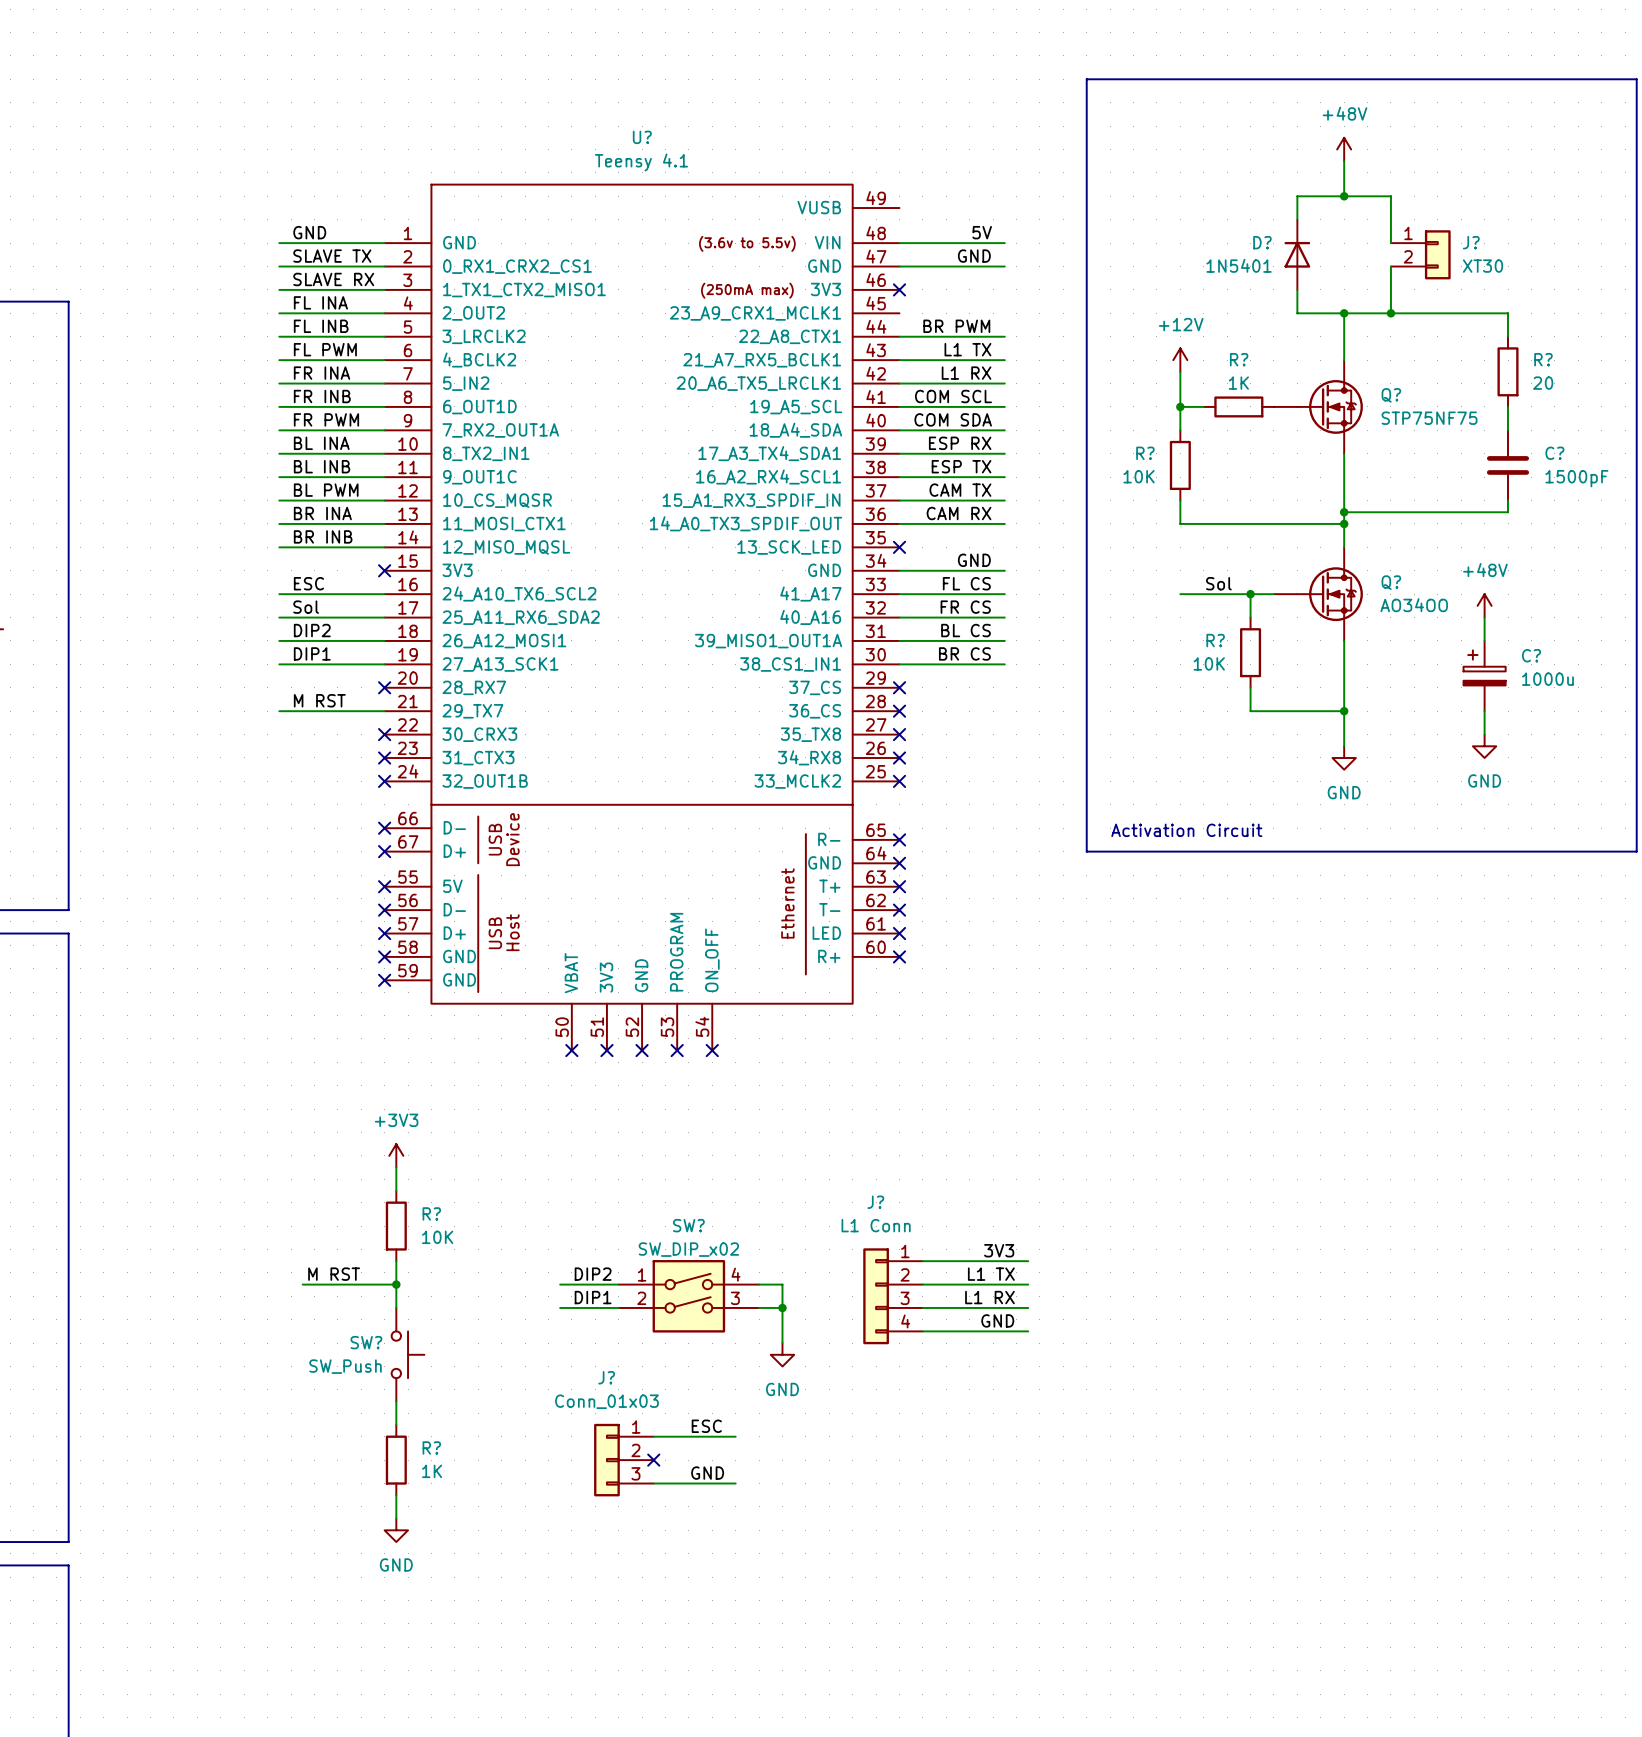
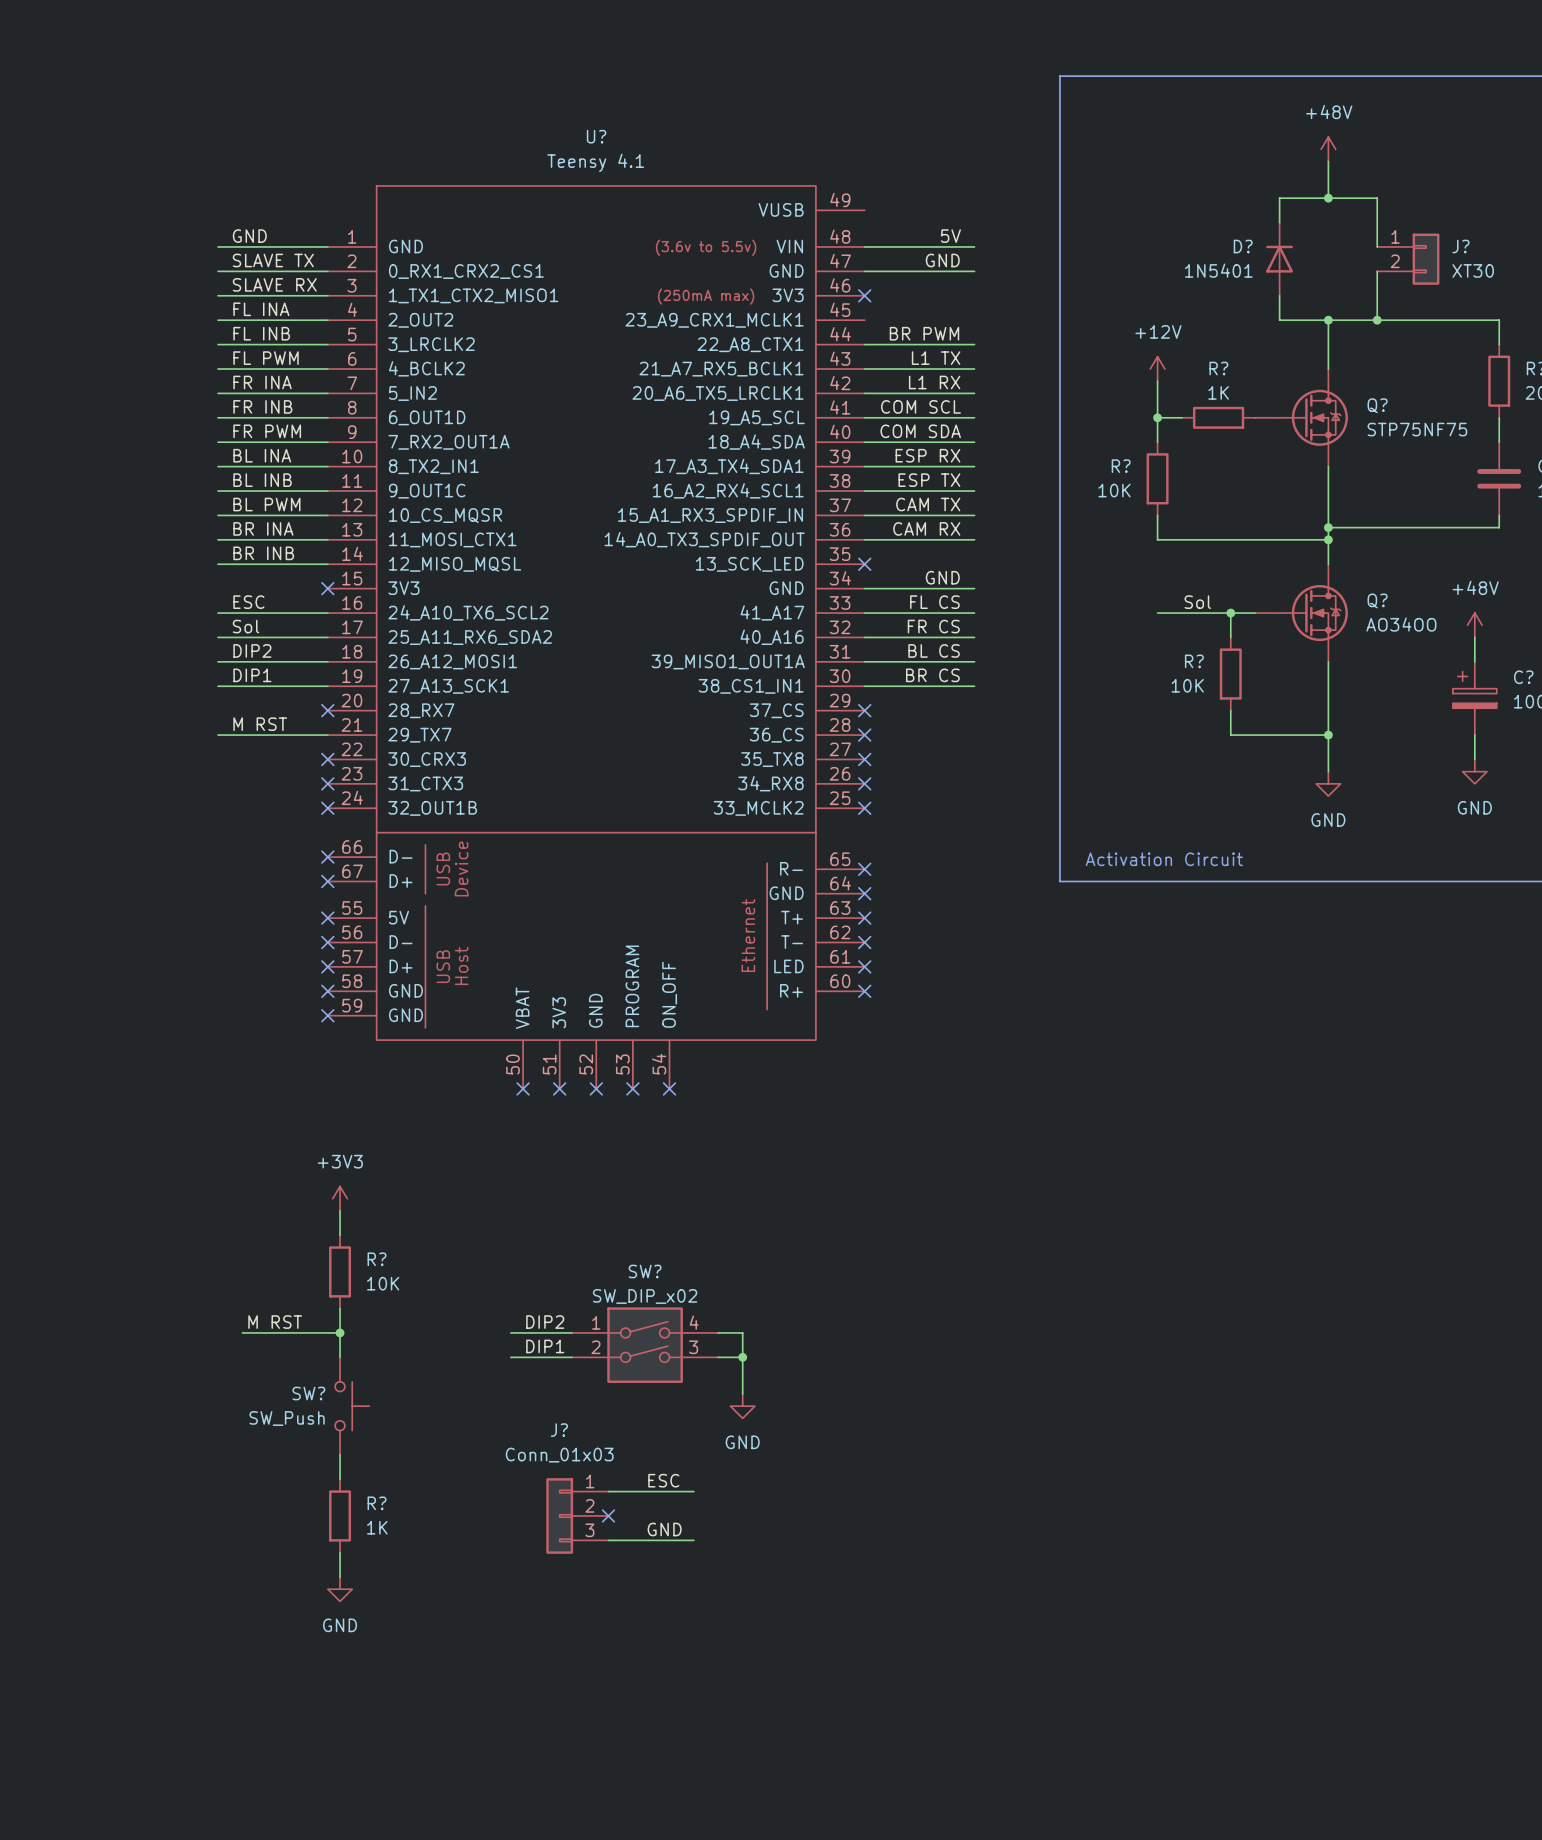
label: 3V3 (999, 1250) -> none
wire: (922, 1261) (1028, 1261) -> none
label: L1 TX (991, 1274) -> none
wire: (922, 1284) (1028, 1284) -> none
J?: L1 Conn (893, 1296) -> none
label: L1 RX (989, 1297) -> none
wire: (922, 1307) (1028, 1307) -> none
label: GND (997, 1320) -> none
wire: (922, 1331) (1028, 1331) -> none

